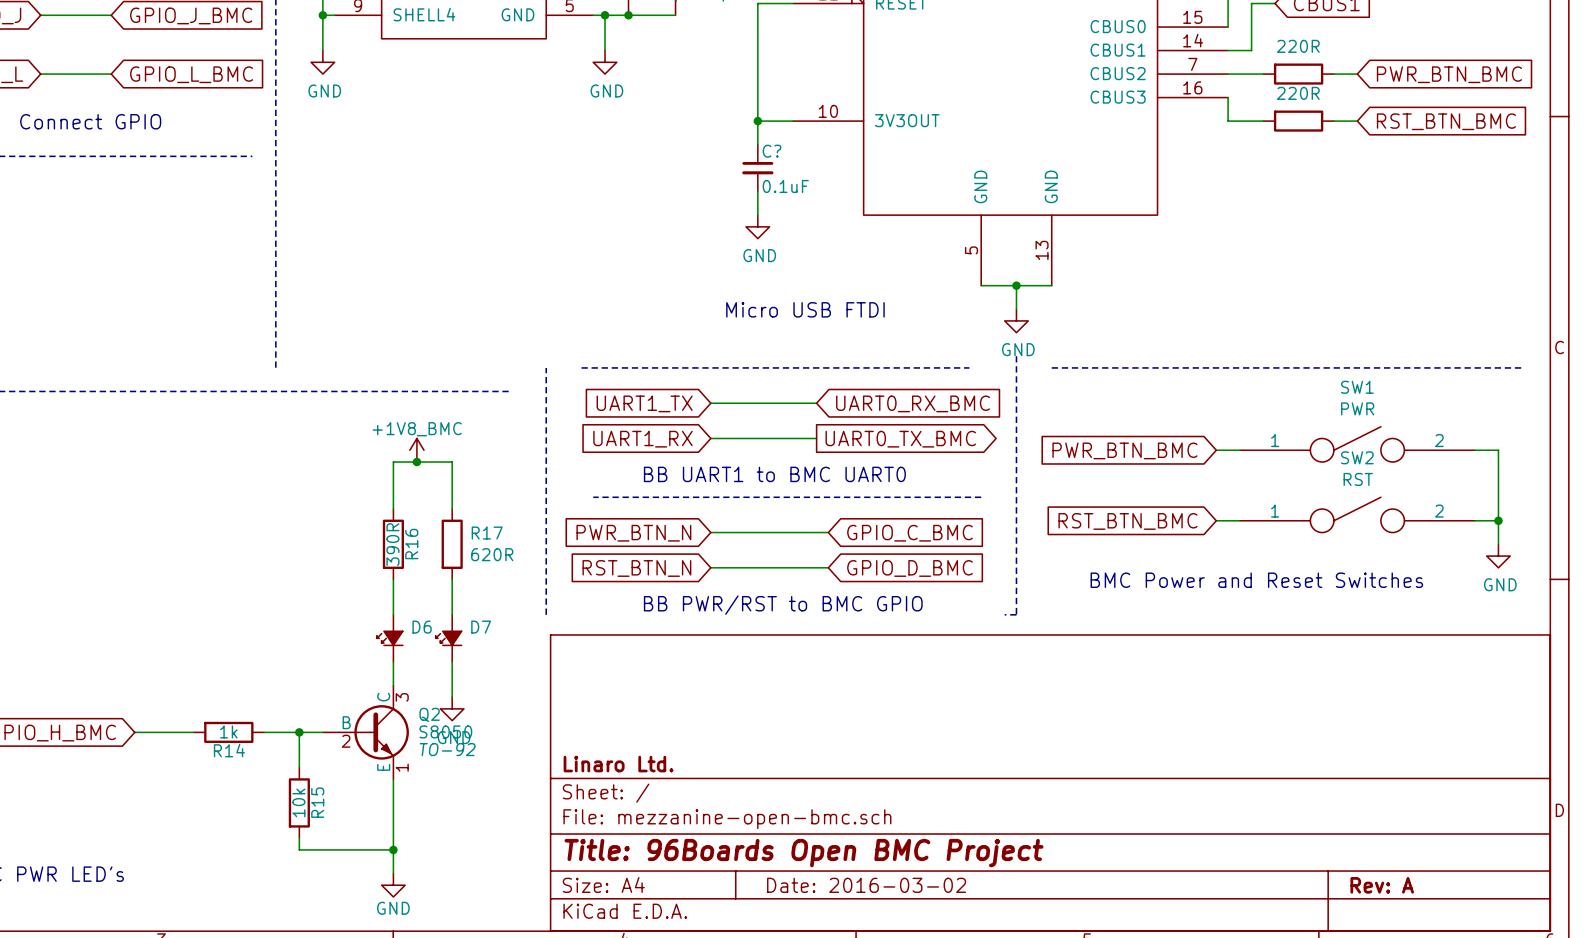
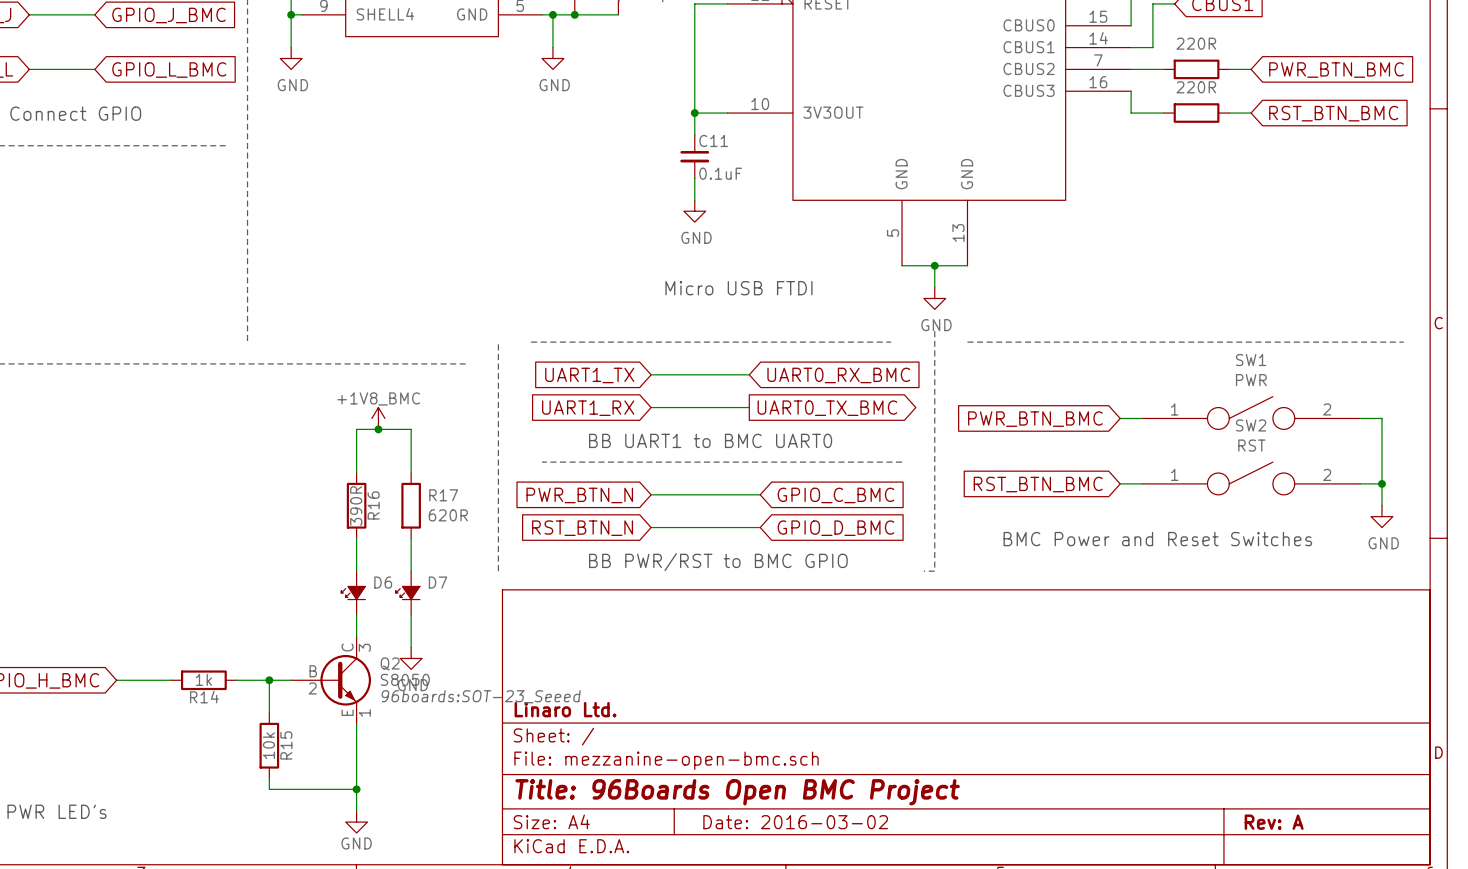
C? name: C? (772, 151) -> C11 (713, 140)
Q2 text: TO-92 (447, 749) -> 96boards:SOT-23_Seeed (481, 696)

